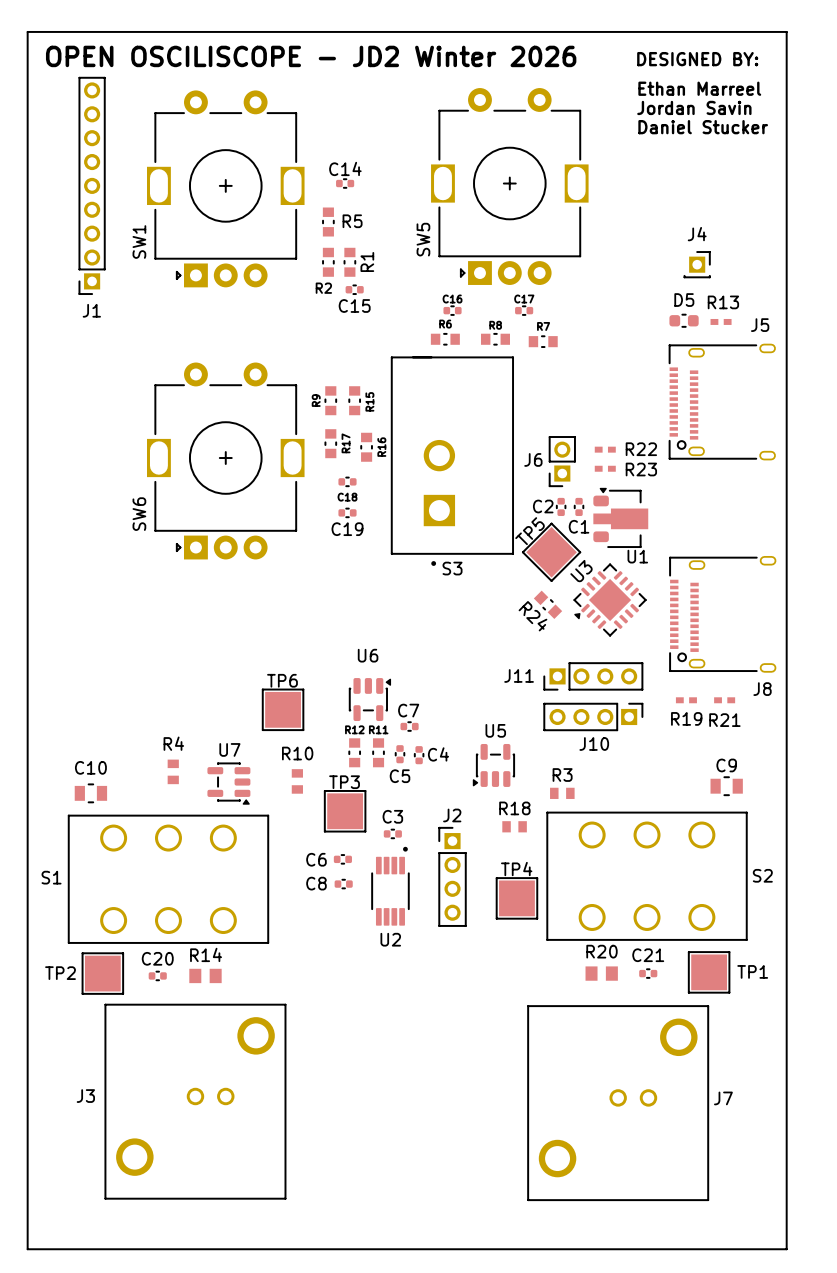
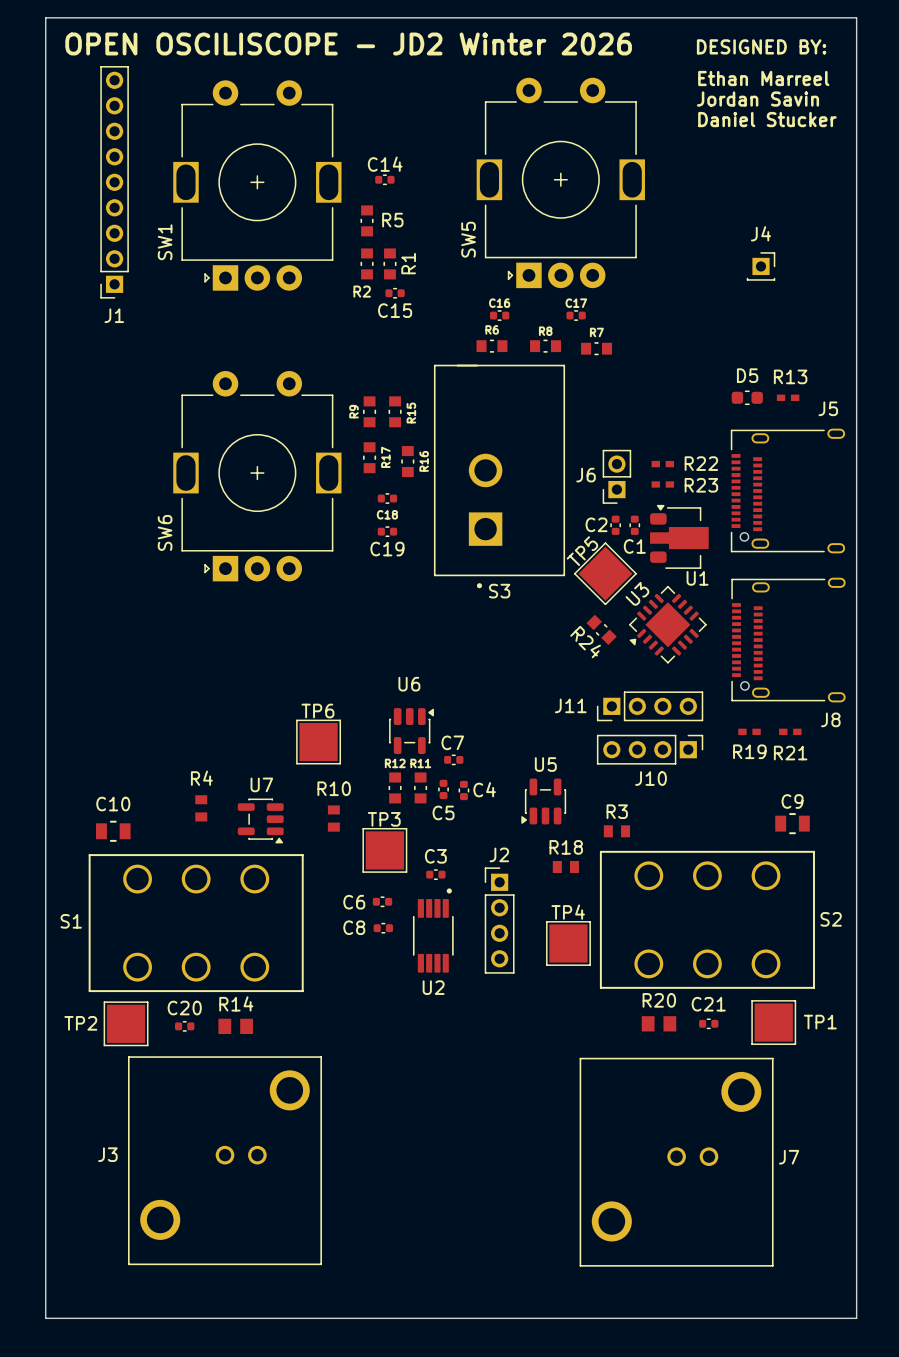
D5 position: (684, 320) -> (747, 397)
R13 position: (721, 321) -> (788, 397)
J5 position: (722, 402) -> (787, 490)

